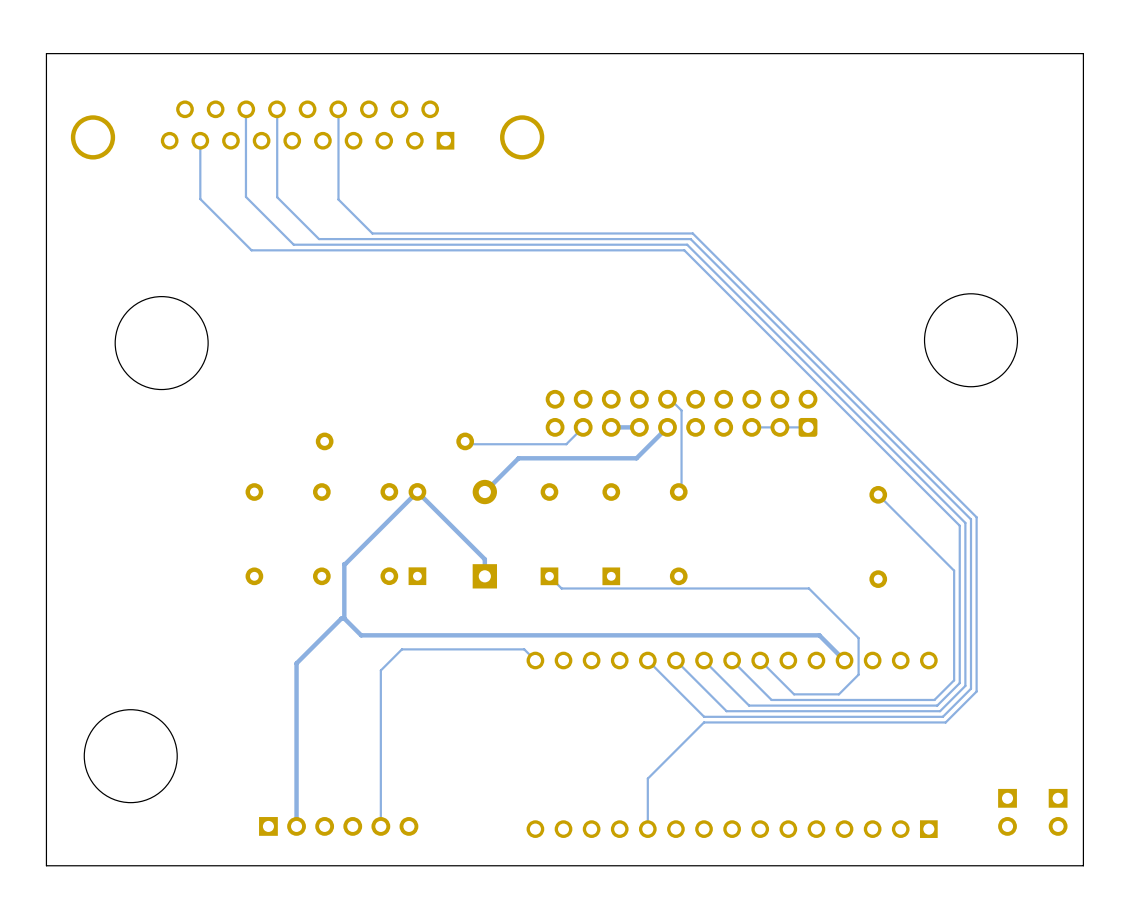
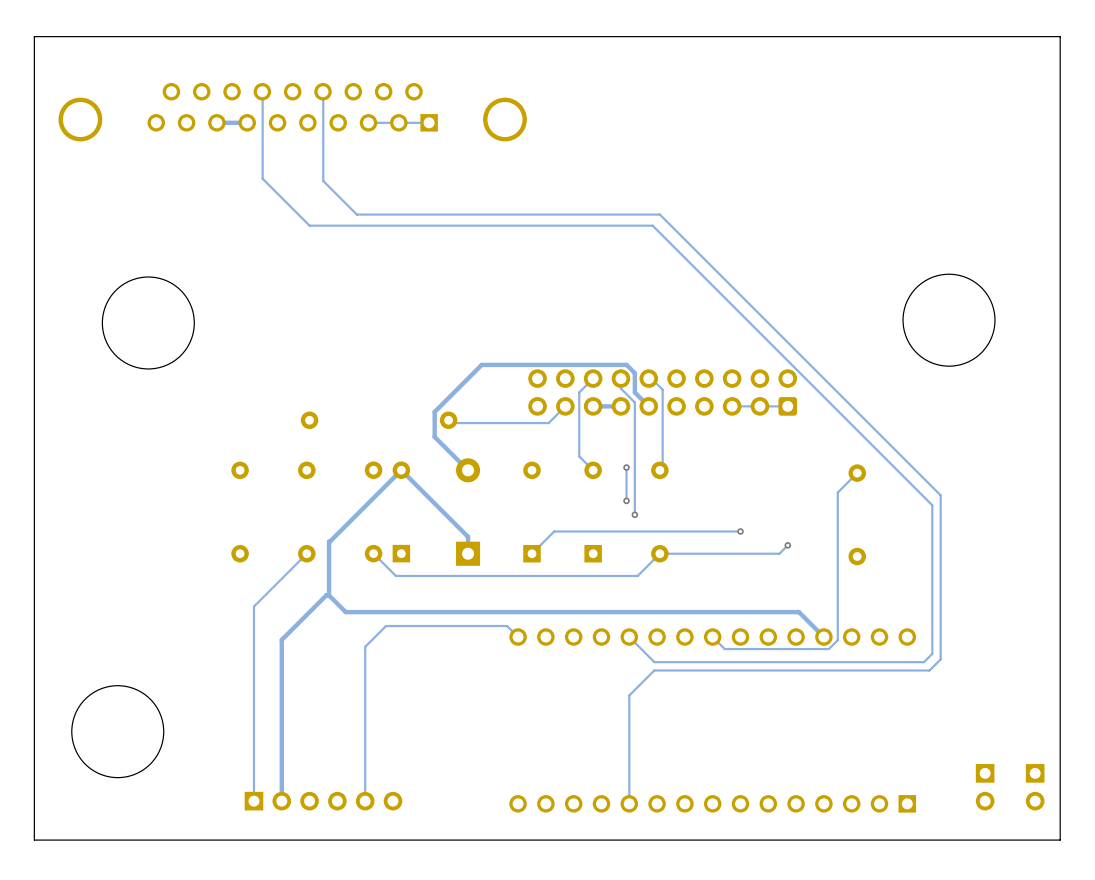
track: (246, 109) (245, 196) (293, 244) (324, 244) -> (304, 220) (309, 225)
track: (200, 140) (200, 199) (251, 250) (684, 250) (959, 525) (959, 683) (937, 705) (749, 705) (704, 660) -> none
track: none -> (247, 122) (216, 122)
track: none -> (429, 122) (368, 122)
track: (678, 233) (692, 233) (976, 517) (976, 691) (945, 722) (704, 722) (647, 778) -> (659, 214) (940, 495) (940, 659) (929, 670) (818, 670)
track: (319, 239) (690, 239) (970, 519) (970, 688) (942, 716) (704, 716) (673, 685) -> none
track: (671, 244) (687, 244) (965, 522) (965, 685) (940, 711) (726, 711) (675, 660) -> (652, 225) (932, 505) (932, 548)
track: none -> (593, 378) (579, 392) (579, 456) (593, 470)
track: none -> (620, 378) (620, 388) (634, 402) (634, 514)
track: (667, 427) (636, 458) (518, 458) (484, 492) -> (648, 406) (634, 392) (634, 373) (626, 364) (481, 364) (434, 411) (434, 436) (468, 470)
track: none -> (626, 467) (626, 500)
via: none -> (626, 467)
track: (878, 494) (954, 570) -> (857, 473) (837, 492) (837, 614)
via: none -> (626, 500)
via: none -> (634, 514)
via: none -> (740, 531)
track: none -> (787, 545) (779, 553) (659, 553) (637, 575) (395, 575) (373, 553)
via: none -> (787, 545)
track: none -> (306, 553) (253, 606) (253, 801)
track: (549, 576) (561, 588) (808, 588) (858, 638) -> (531, 553) (554, 531) (740, 531)
track: (760, 660) (794, 694) -> (629, 753) (629, 695) (654, 670) (773, 670)
track: (858, 663) (858, 674) (838, 694) -> (837, 640) (828, 649) (724, 649)
track: (744, 672) (771, 699) (934, 699) (954, 680) (954, 677) -> (654, 662) (923, 662) (932, 653)

